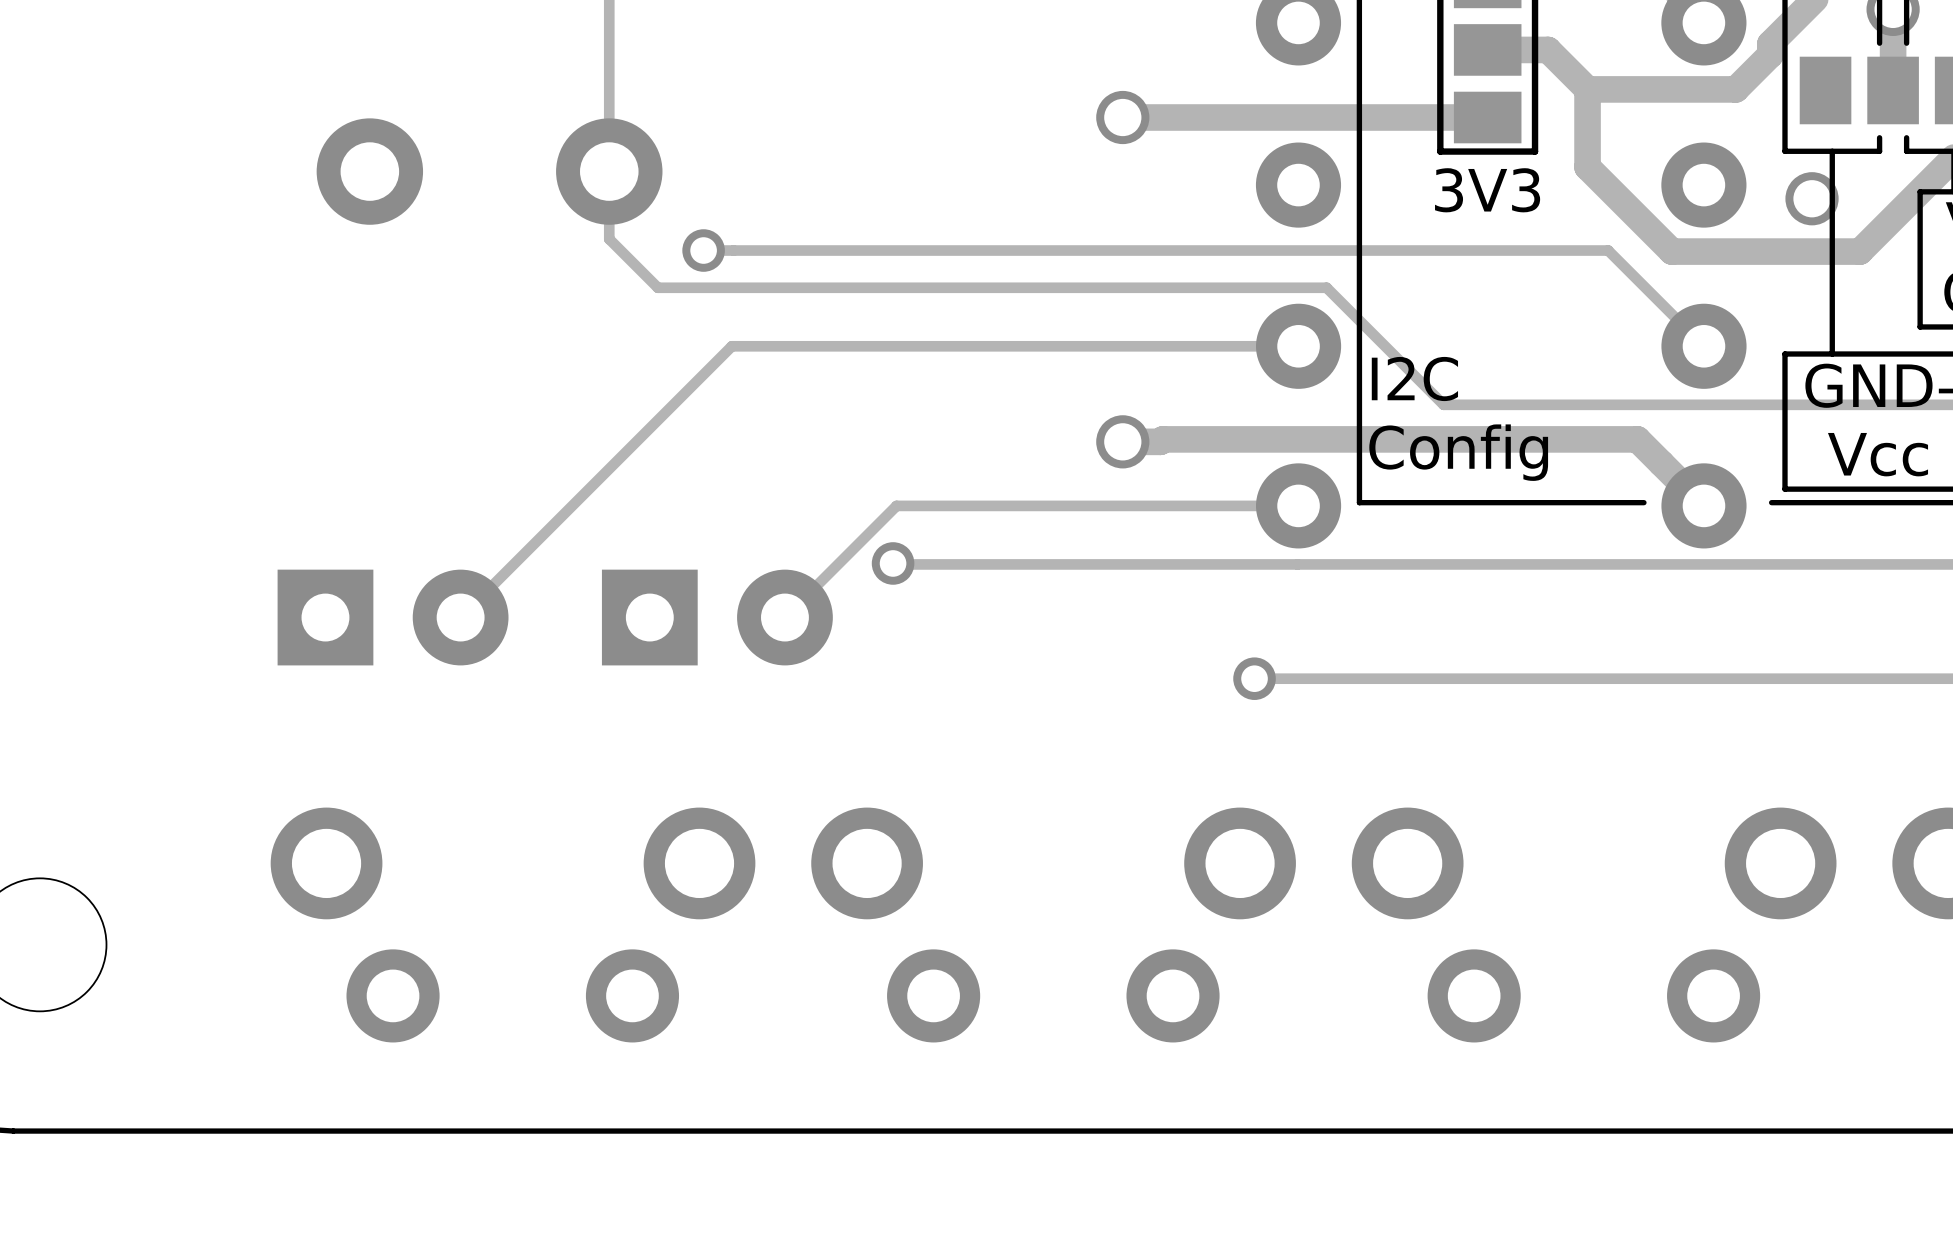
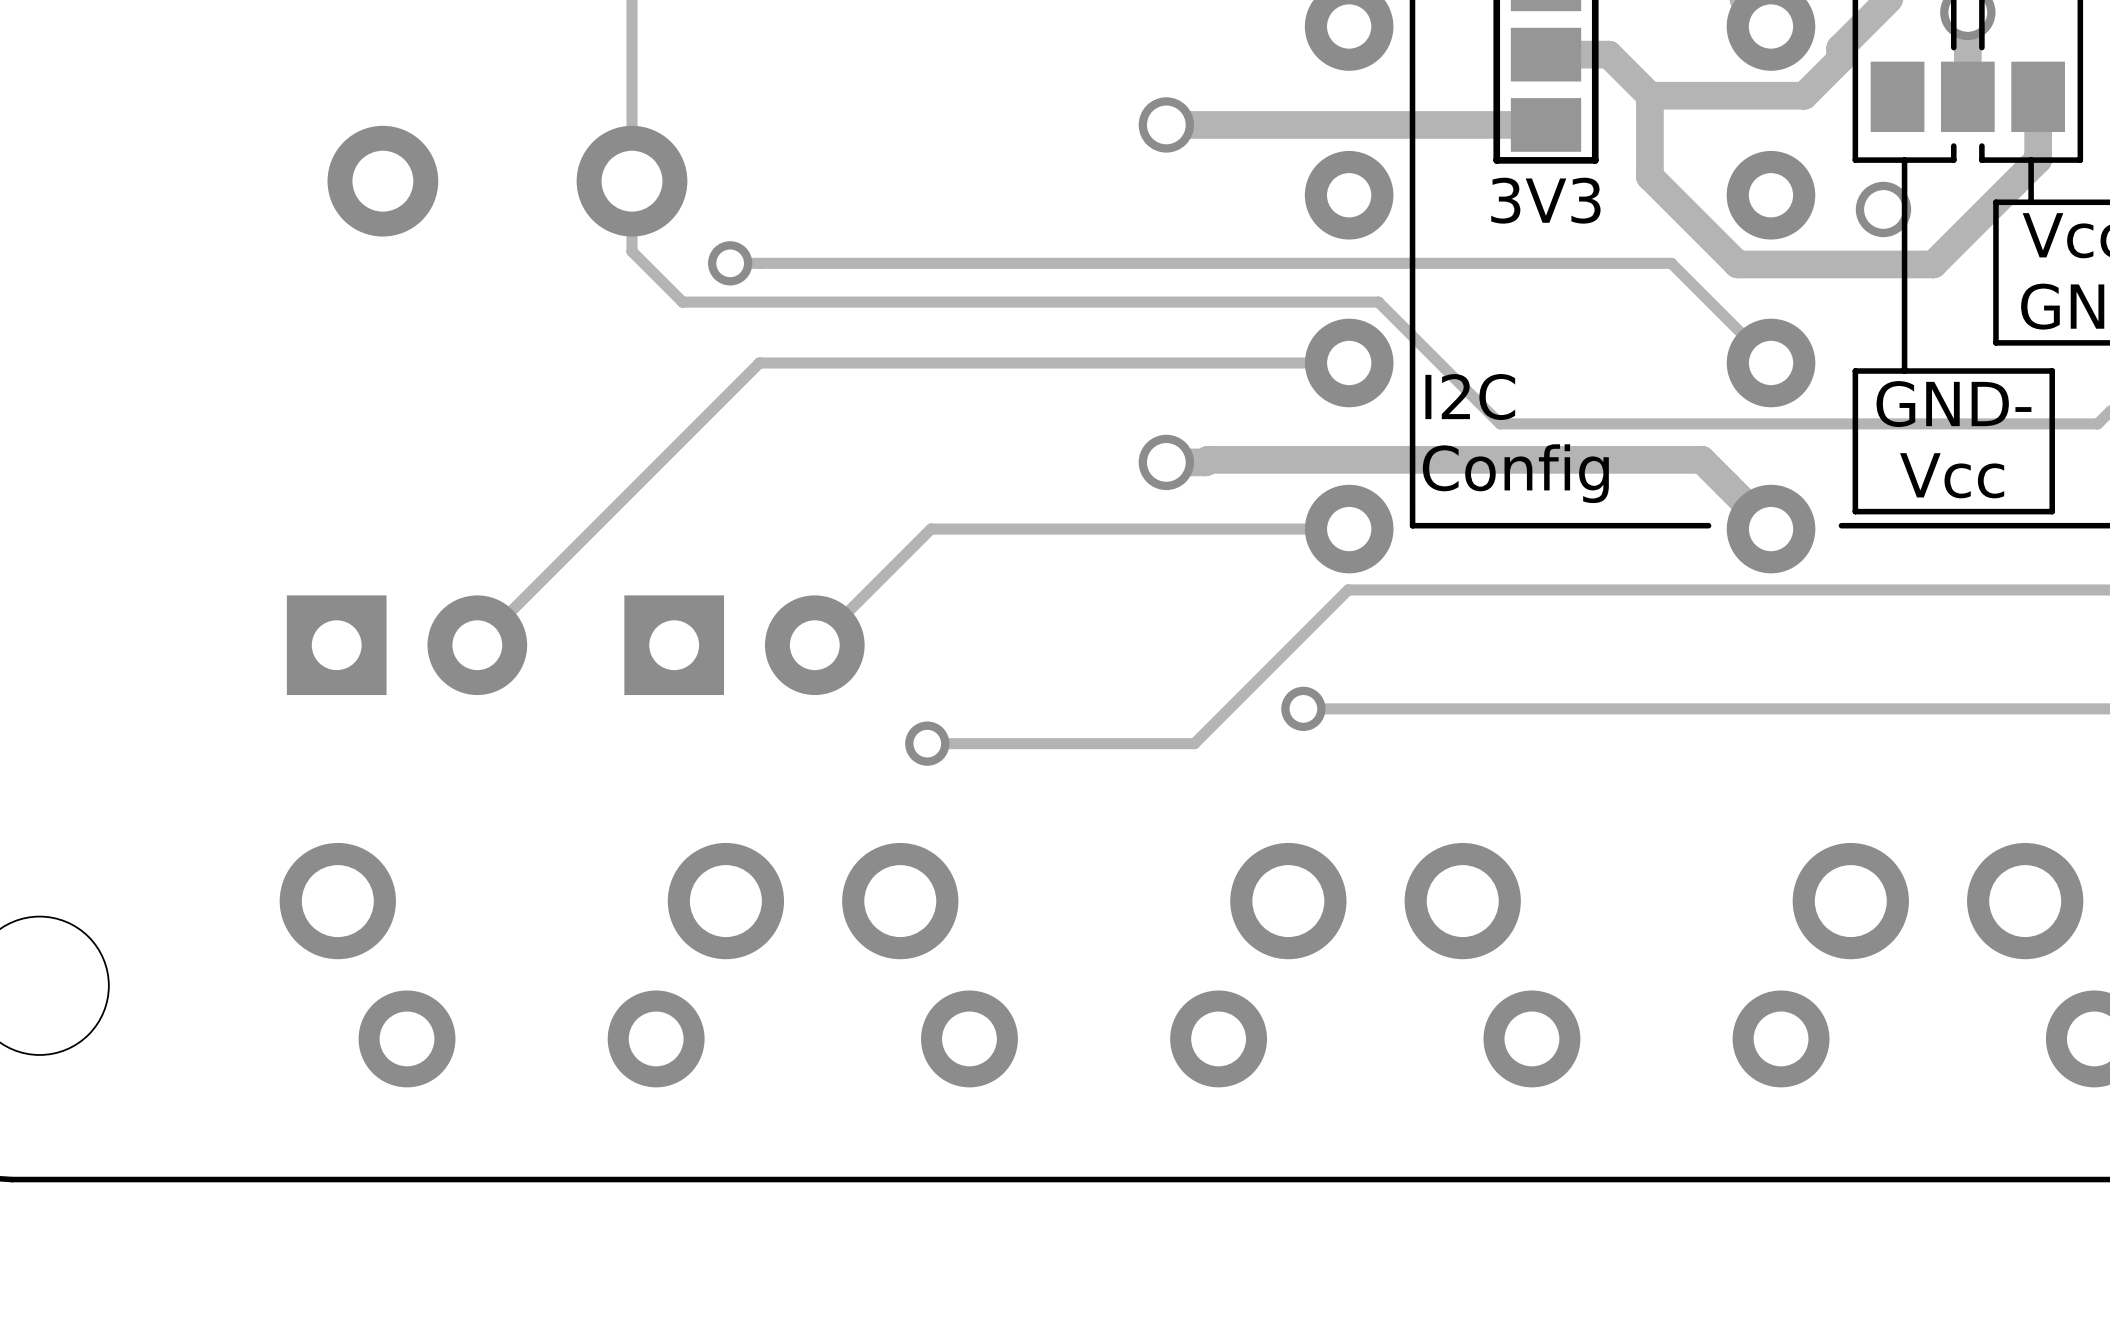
track: (893, 563) (1297, 564) -> (927, 743) (1194, 743) (1348, 589)
via position: (893, 563) -> (927, 743)

